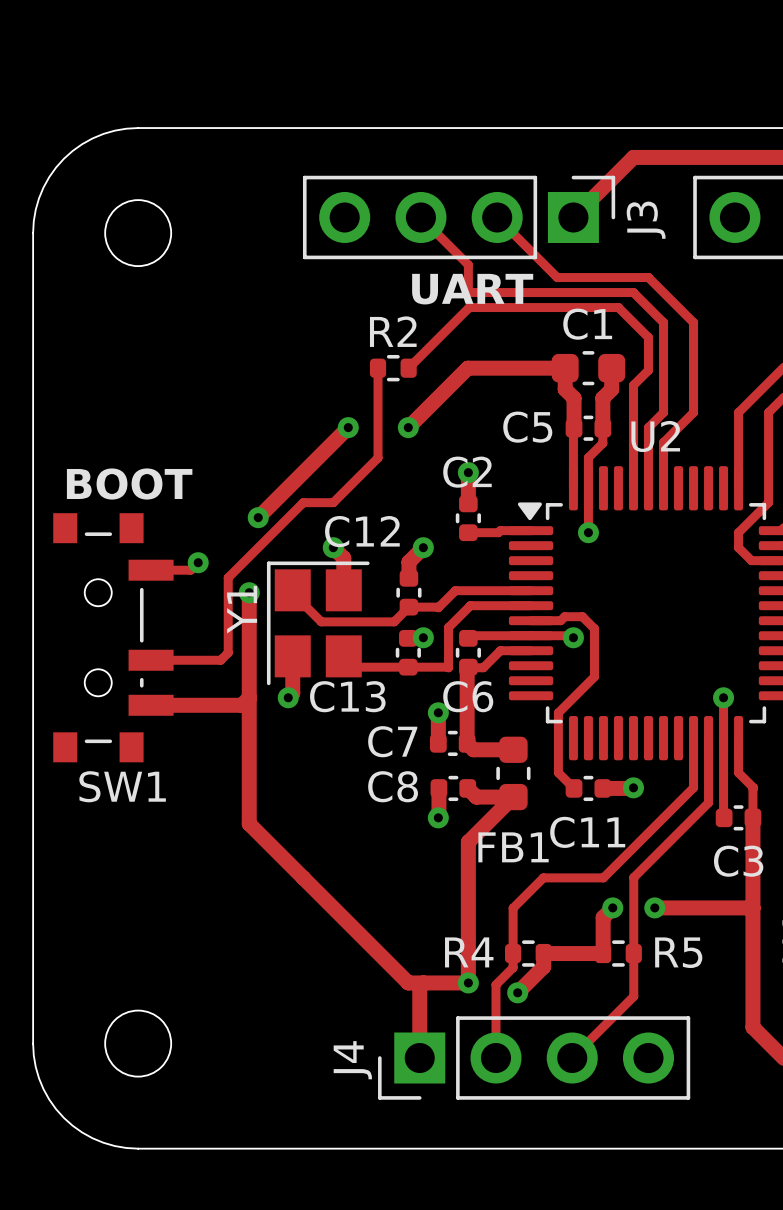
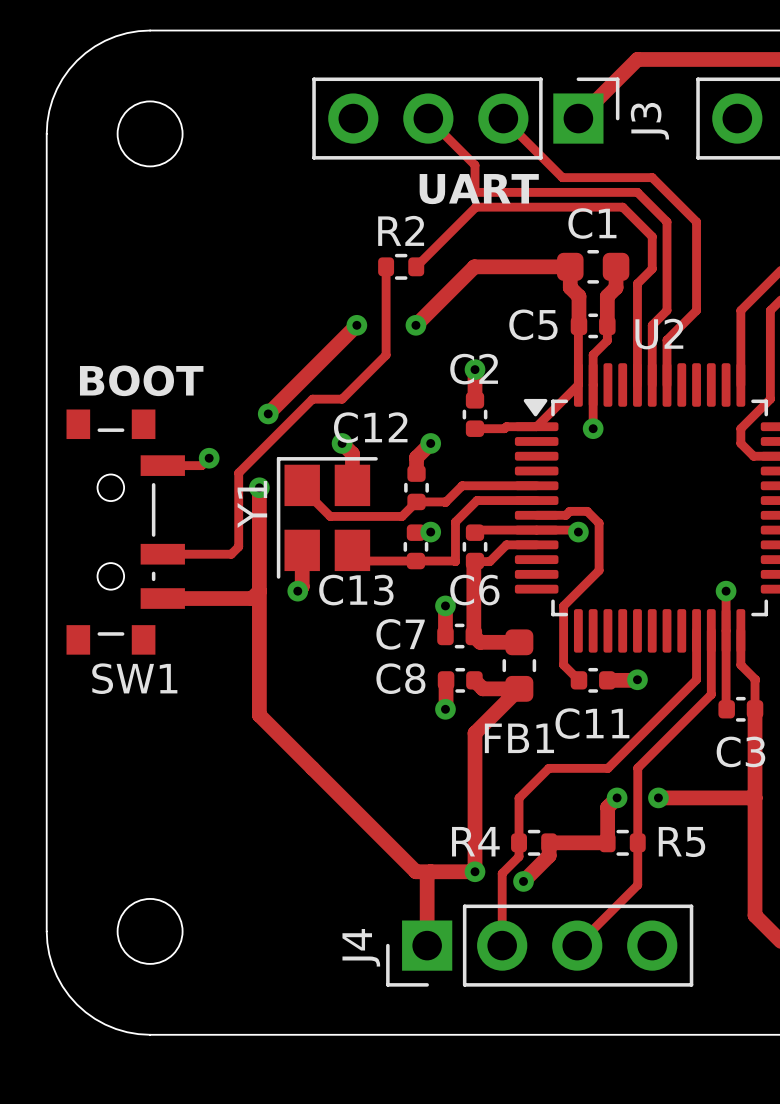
track: none -> (578, 384) (536, 426)

